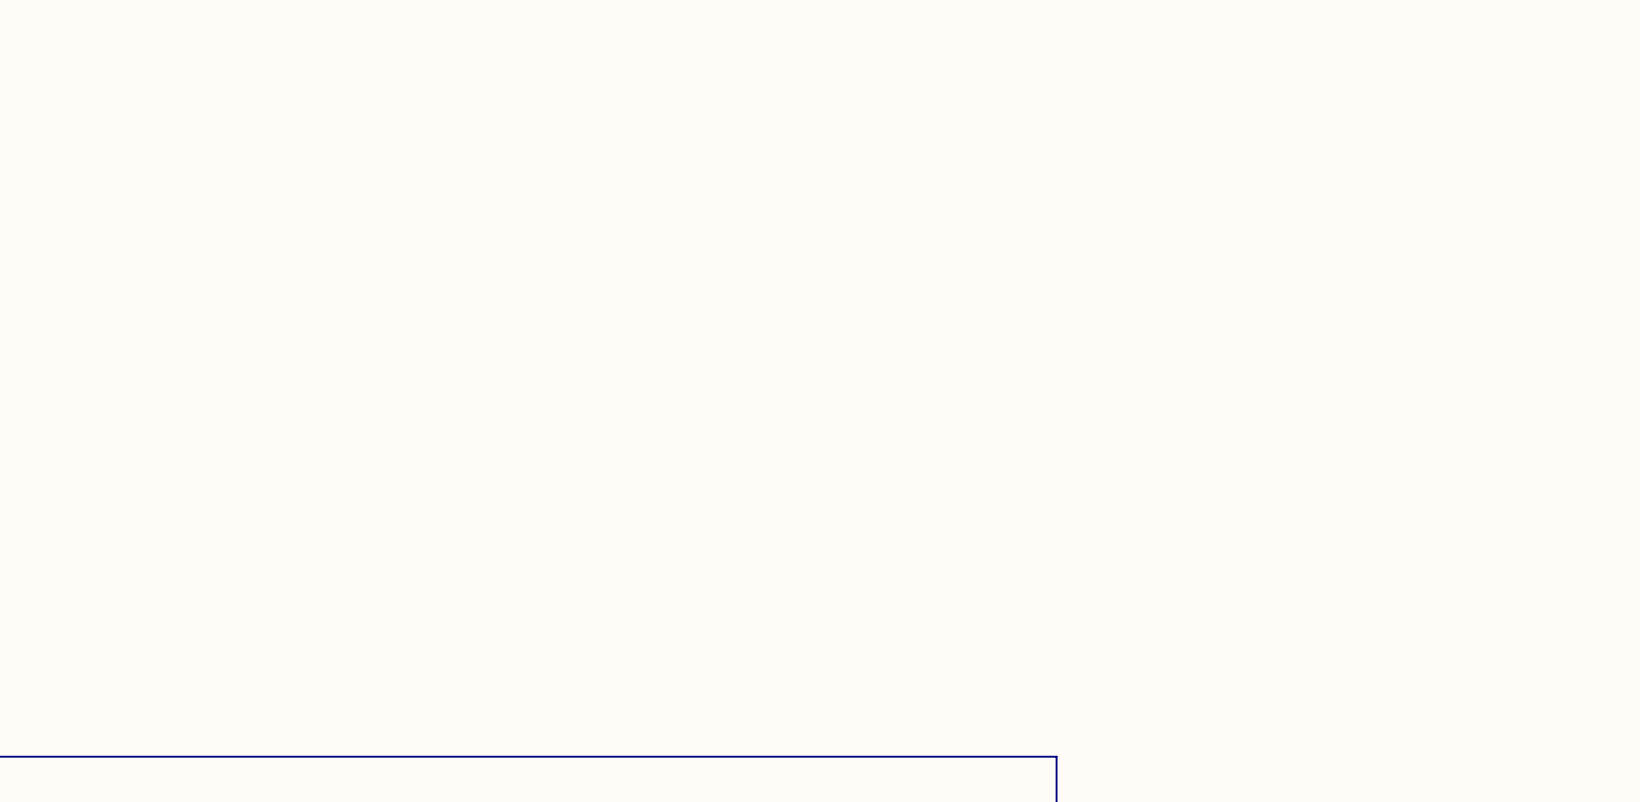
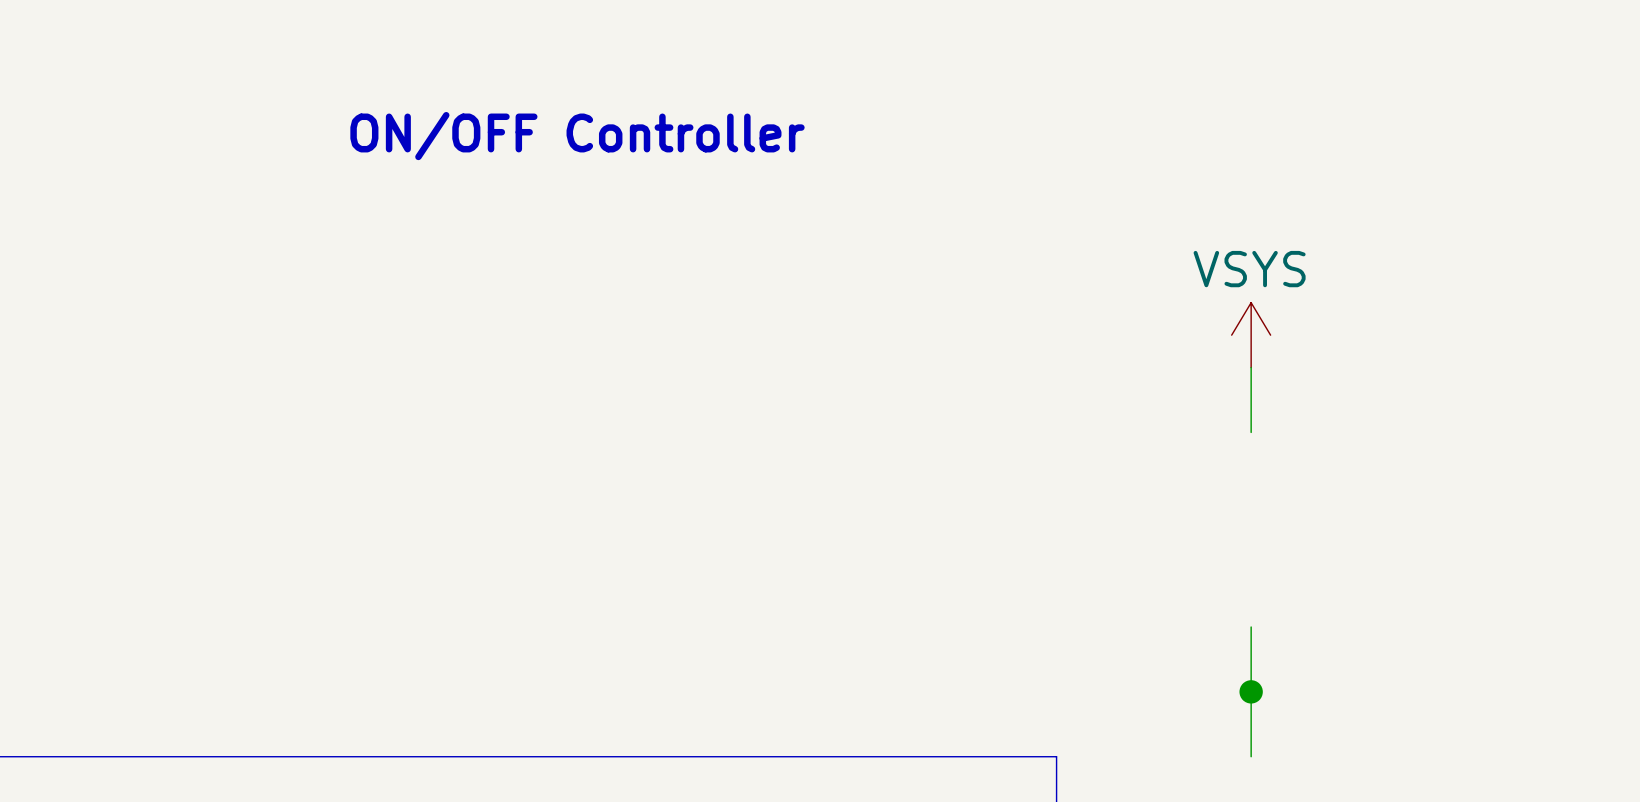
text: none -> ON/OFF Controller (577, 136)
power symbol: none -> VSYS (1251, 335)
wire: none -> (1251, 367) (1251, 432)
wire: none -> (1251, 627) (1251, 756)
junction: none -> (1251, 691)

